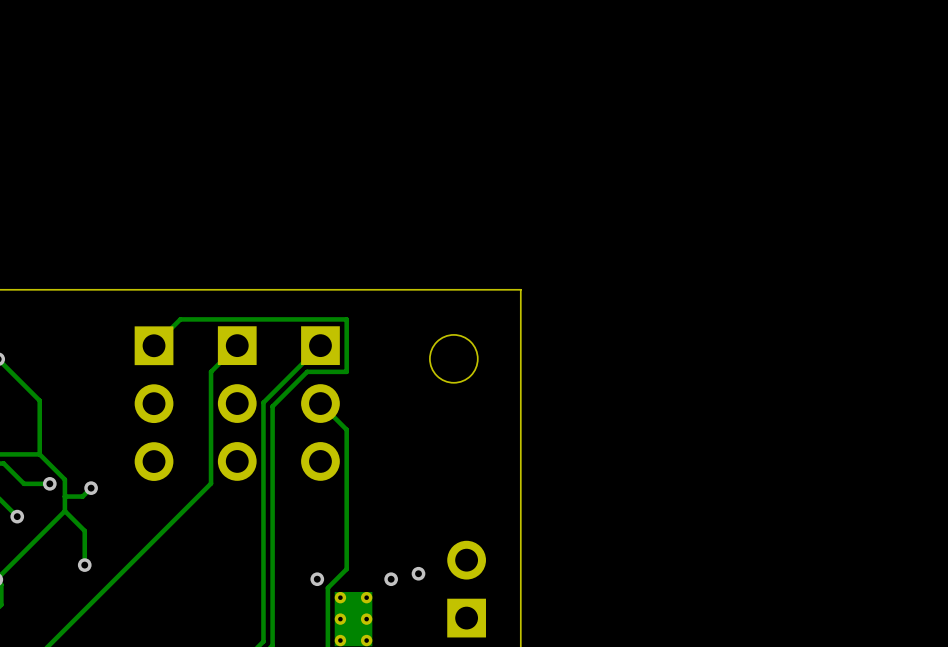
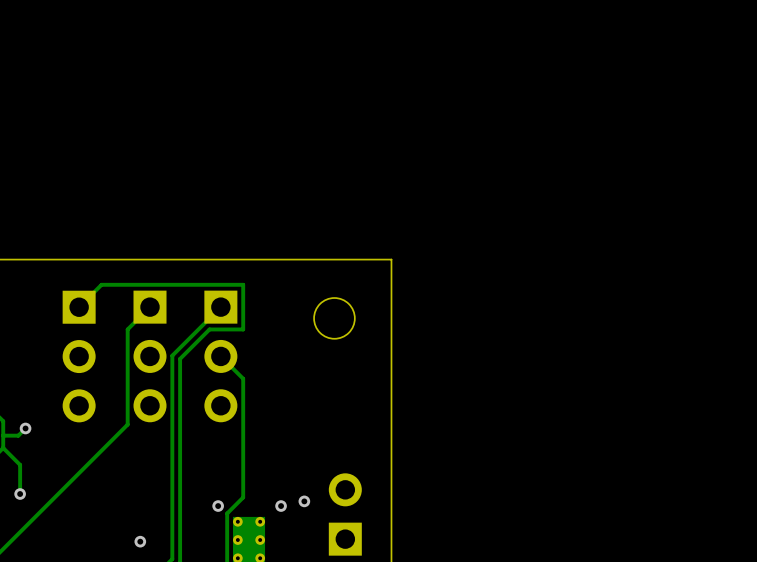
via: none -> (140, 541)

